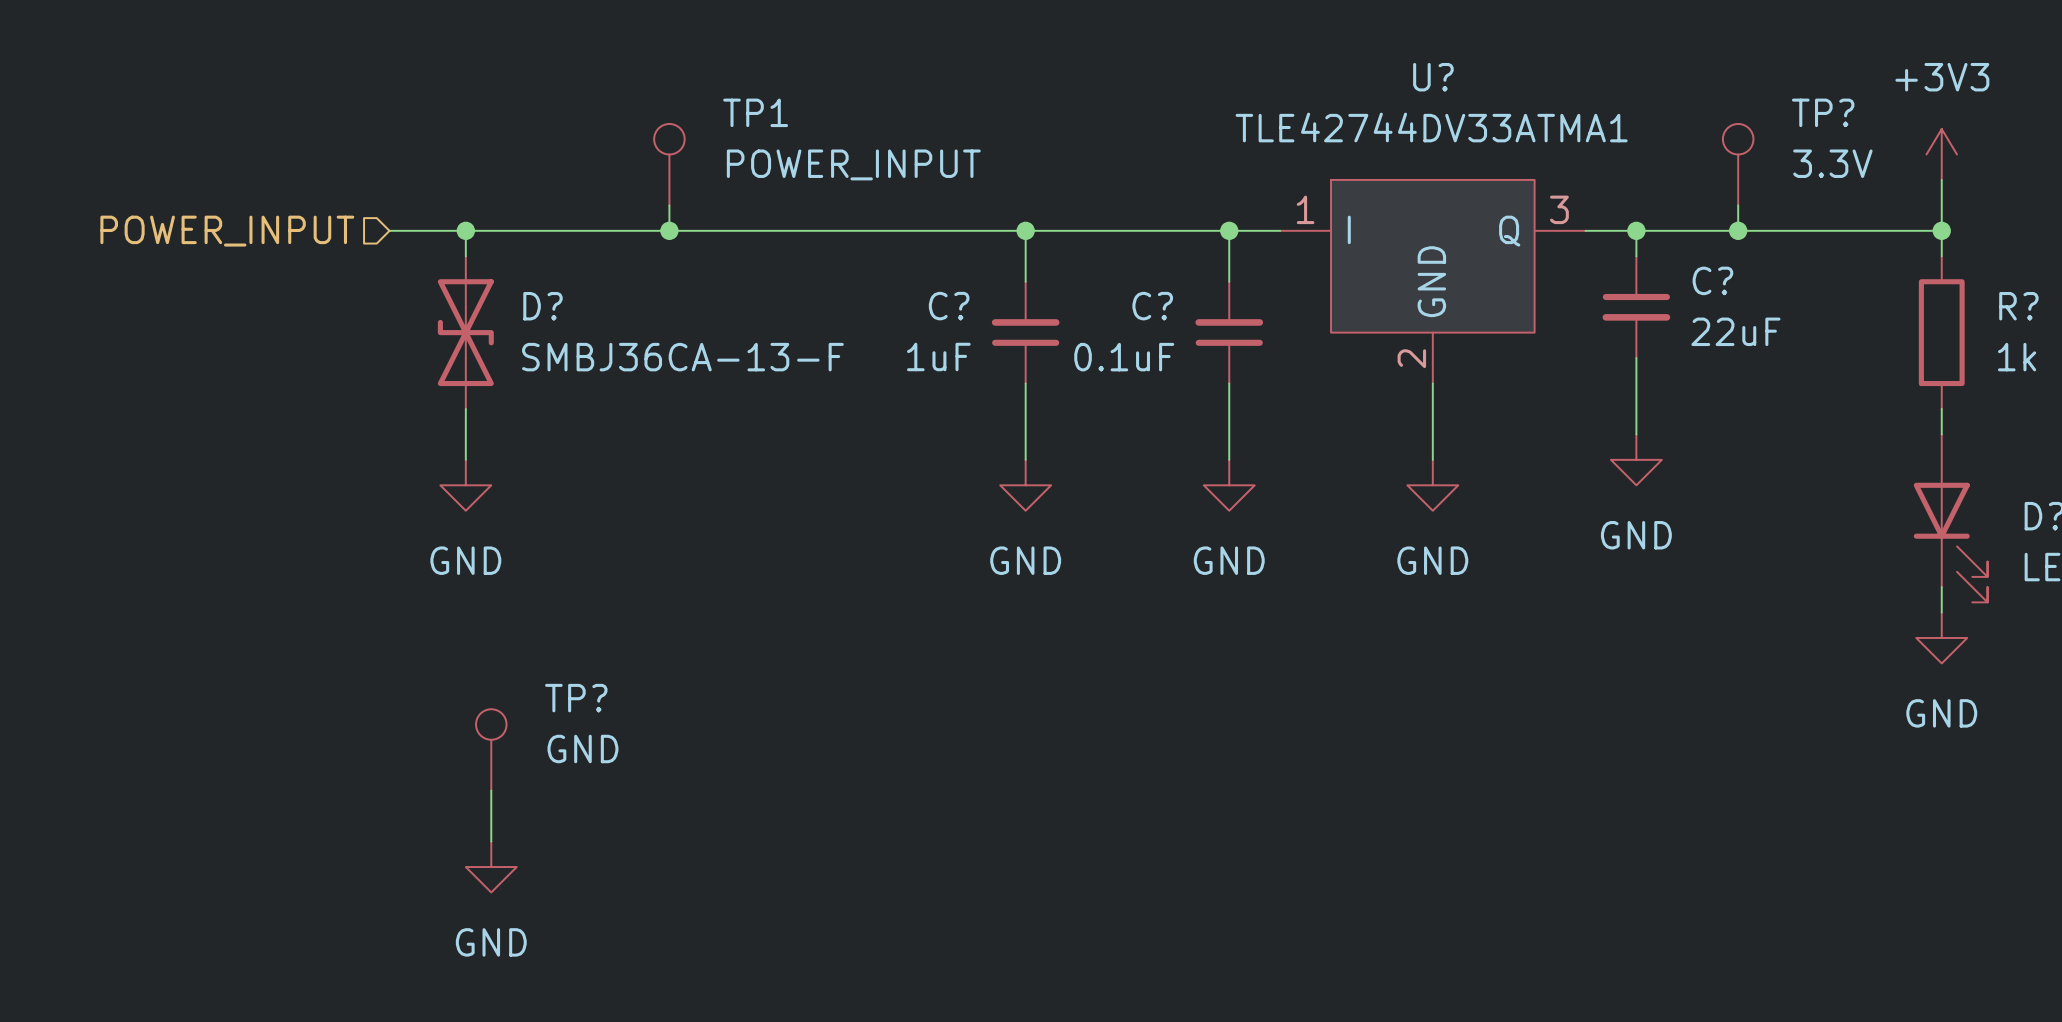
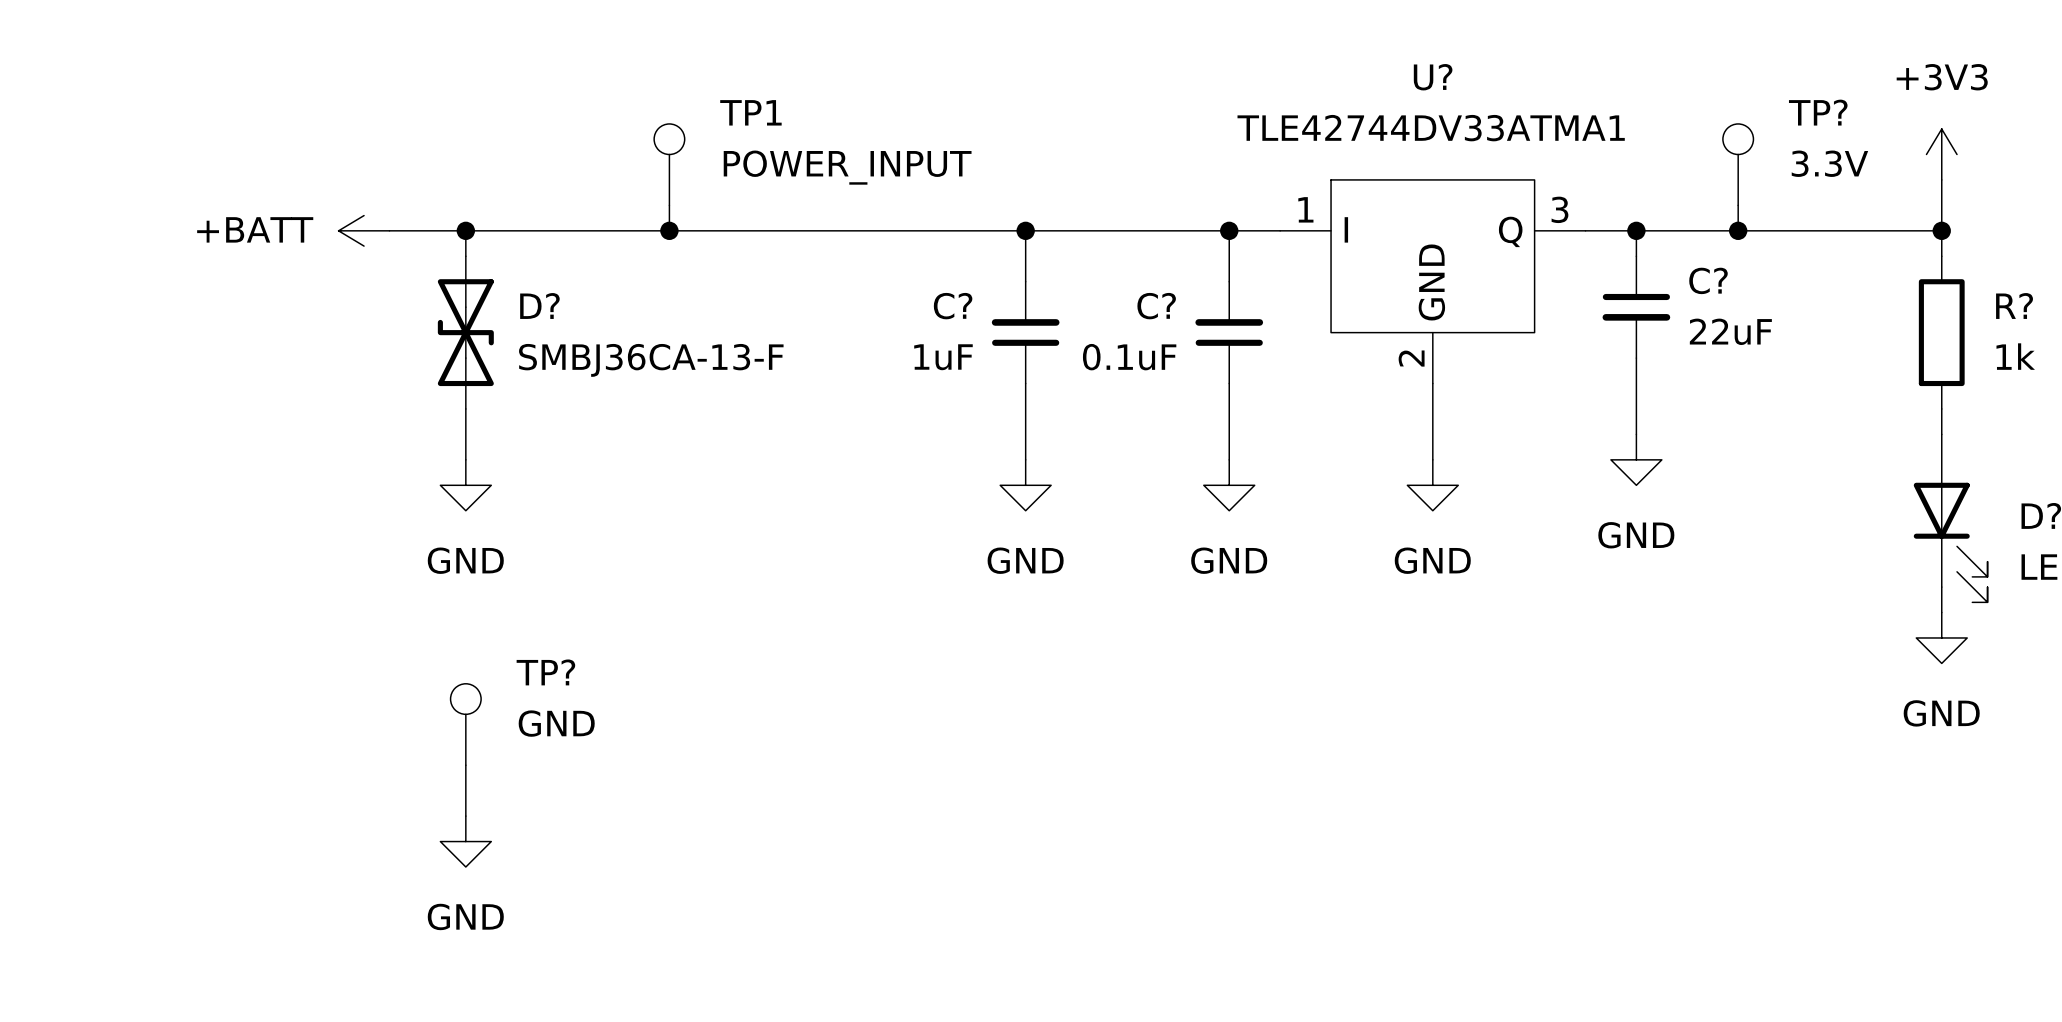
power symbol: none -> +BATT (364, 230)
hierarchical label: POWER_INPUT (227, 231) -> none
TP? position: (491, 749) -> (465, 724)
wire: (491, 790) (491, 841) -> (465, 765) (465, 816)
power symbol position: GND (491, 867) -> GND (465, 841)

